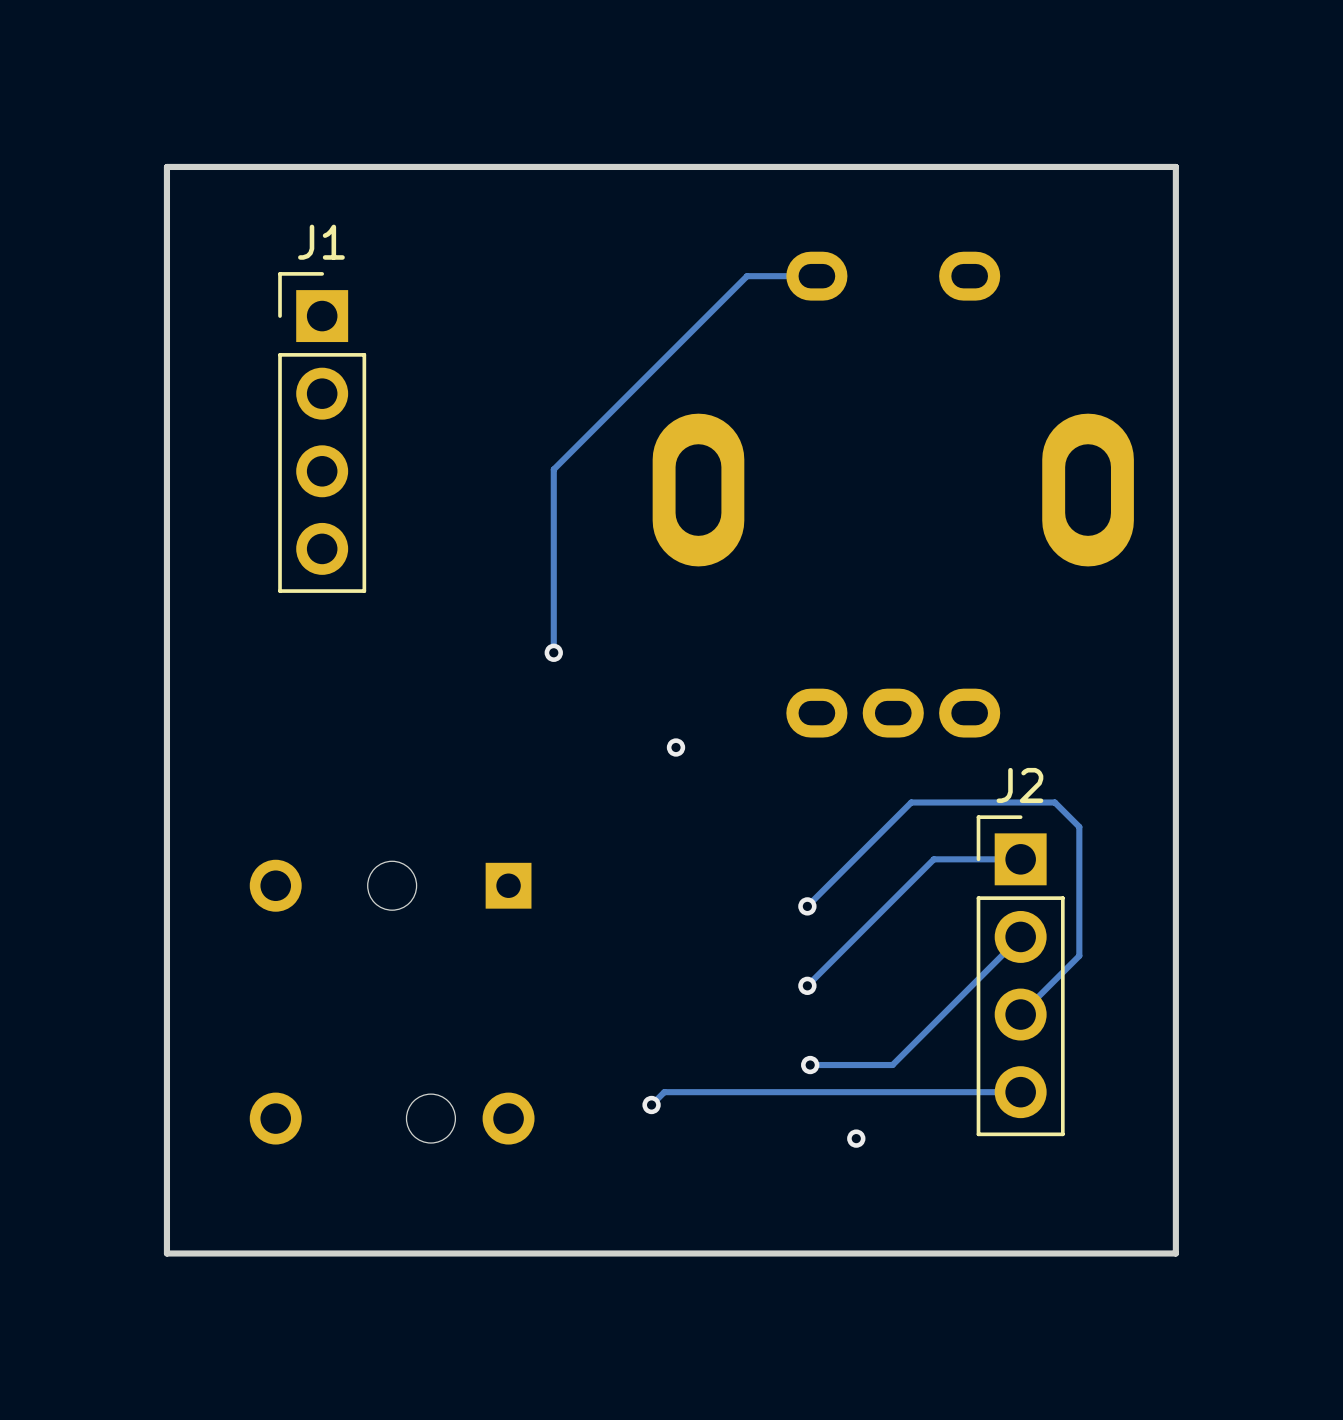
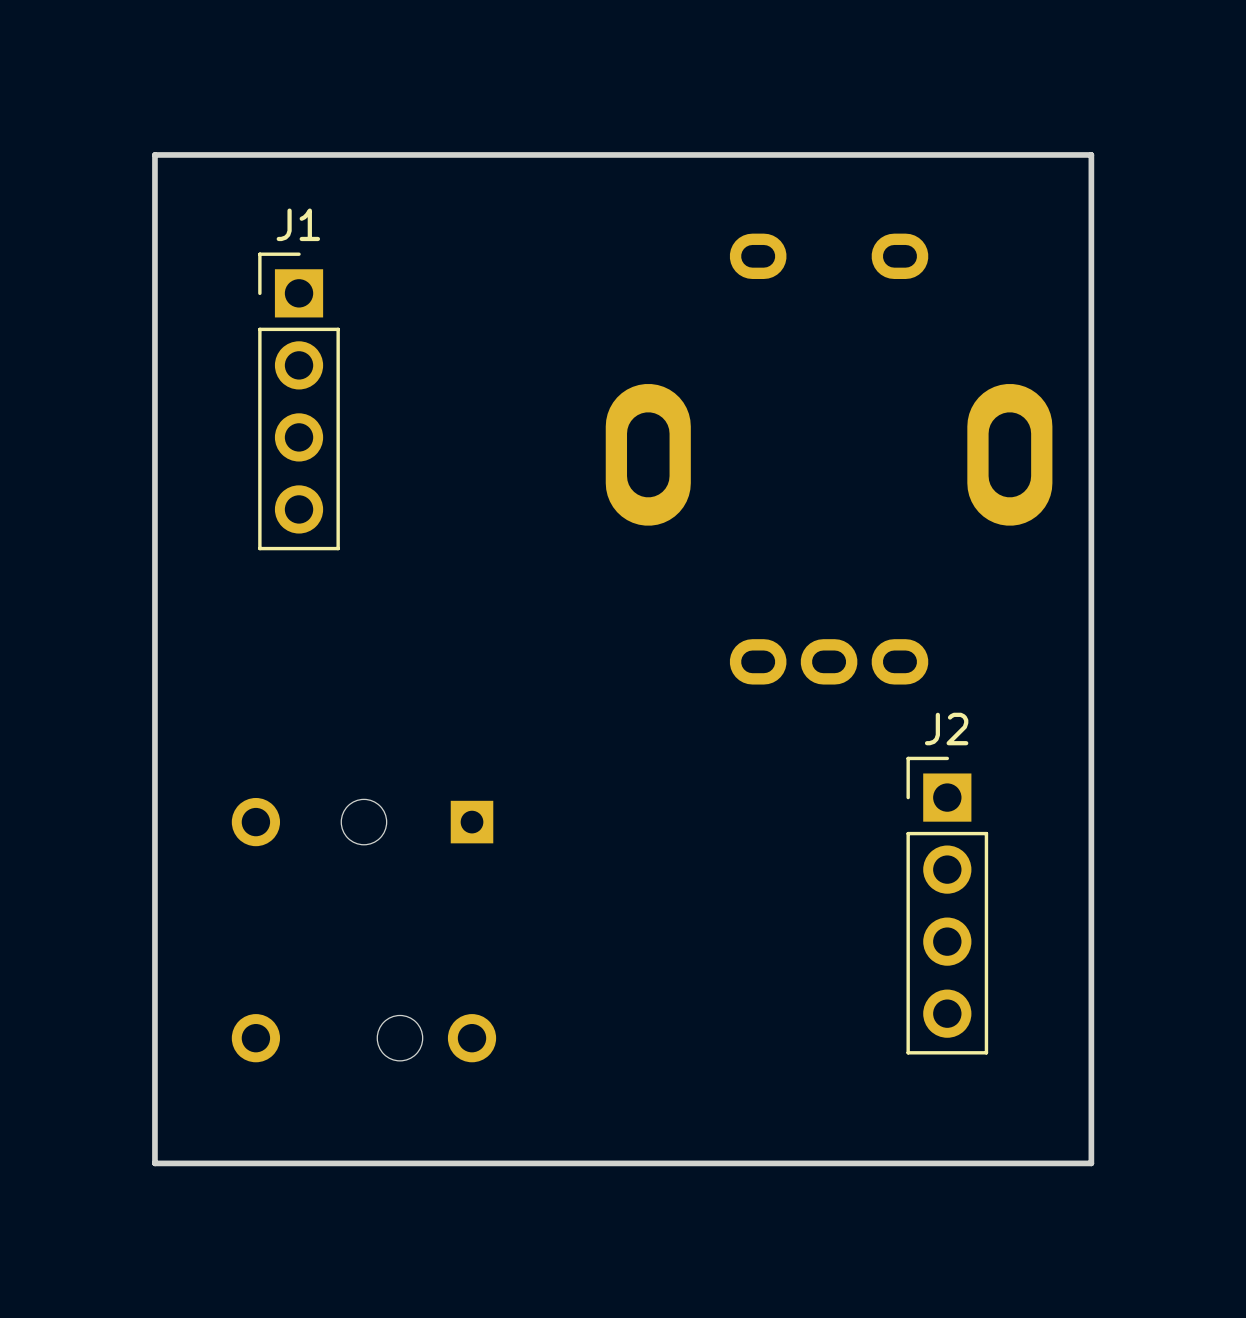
track: (816, 276) (747, 276) (553, 469) (553, 652) -> none
via: (553, 652) -> none
via: (676, 747) -> none
track: (1020, 859) (933, 859) (804, 988) -> none
track: (807, 906) (911, 802) (1054, 802) (1079, 826) (1079, 955) (1020, 1014) -> none
via: (807, 906) -> none
track: (1020, 936) (892, 1065) (810, 1065) -> none
via: (807, 985) -> none
via: (810, 1065) -> none
track: (1020, 1092) (664, 1092) (651, 1105) -> none
via: (651, 1105) -> none
via: (856, 1138) -> none

